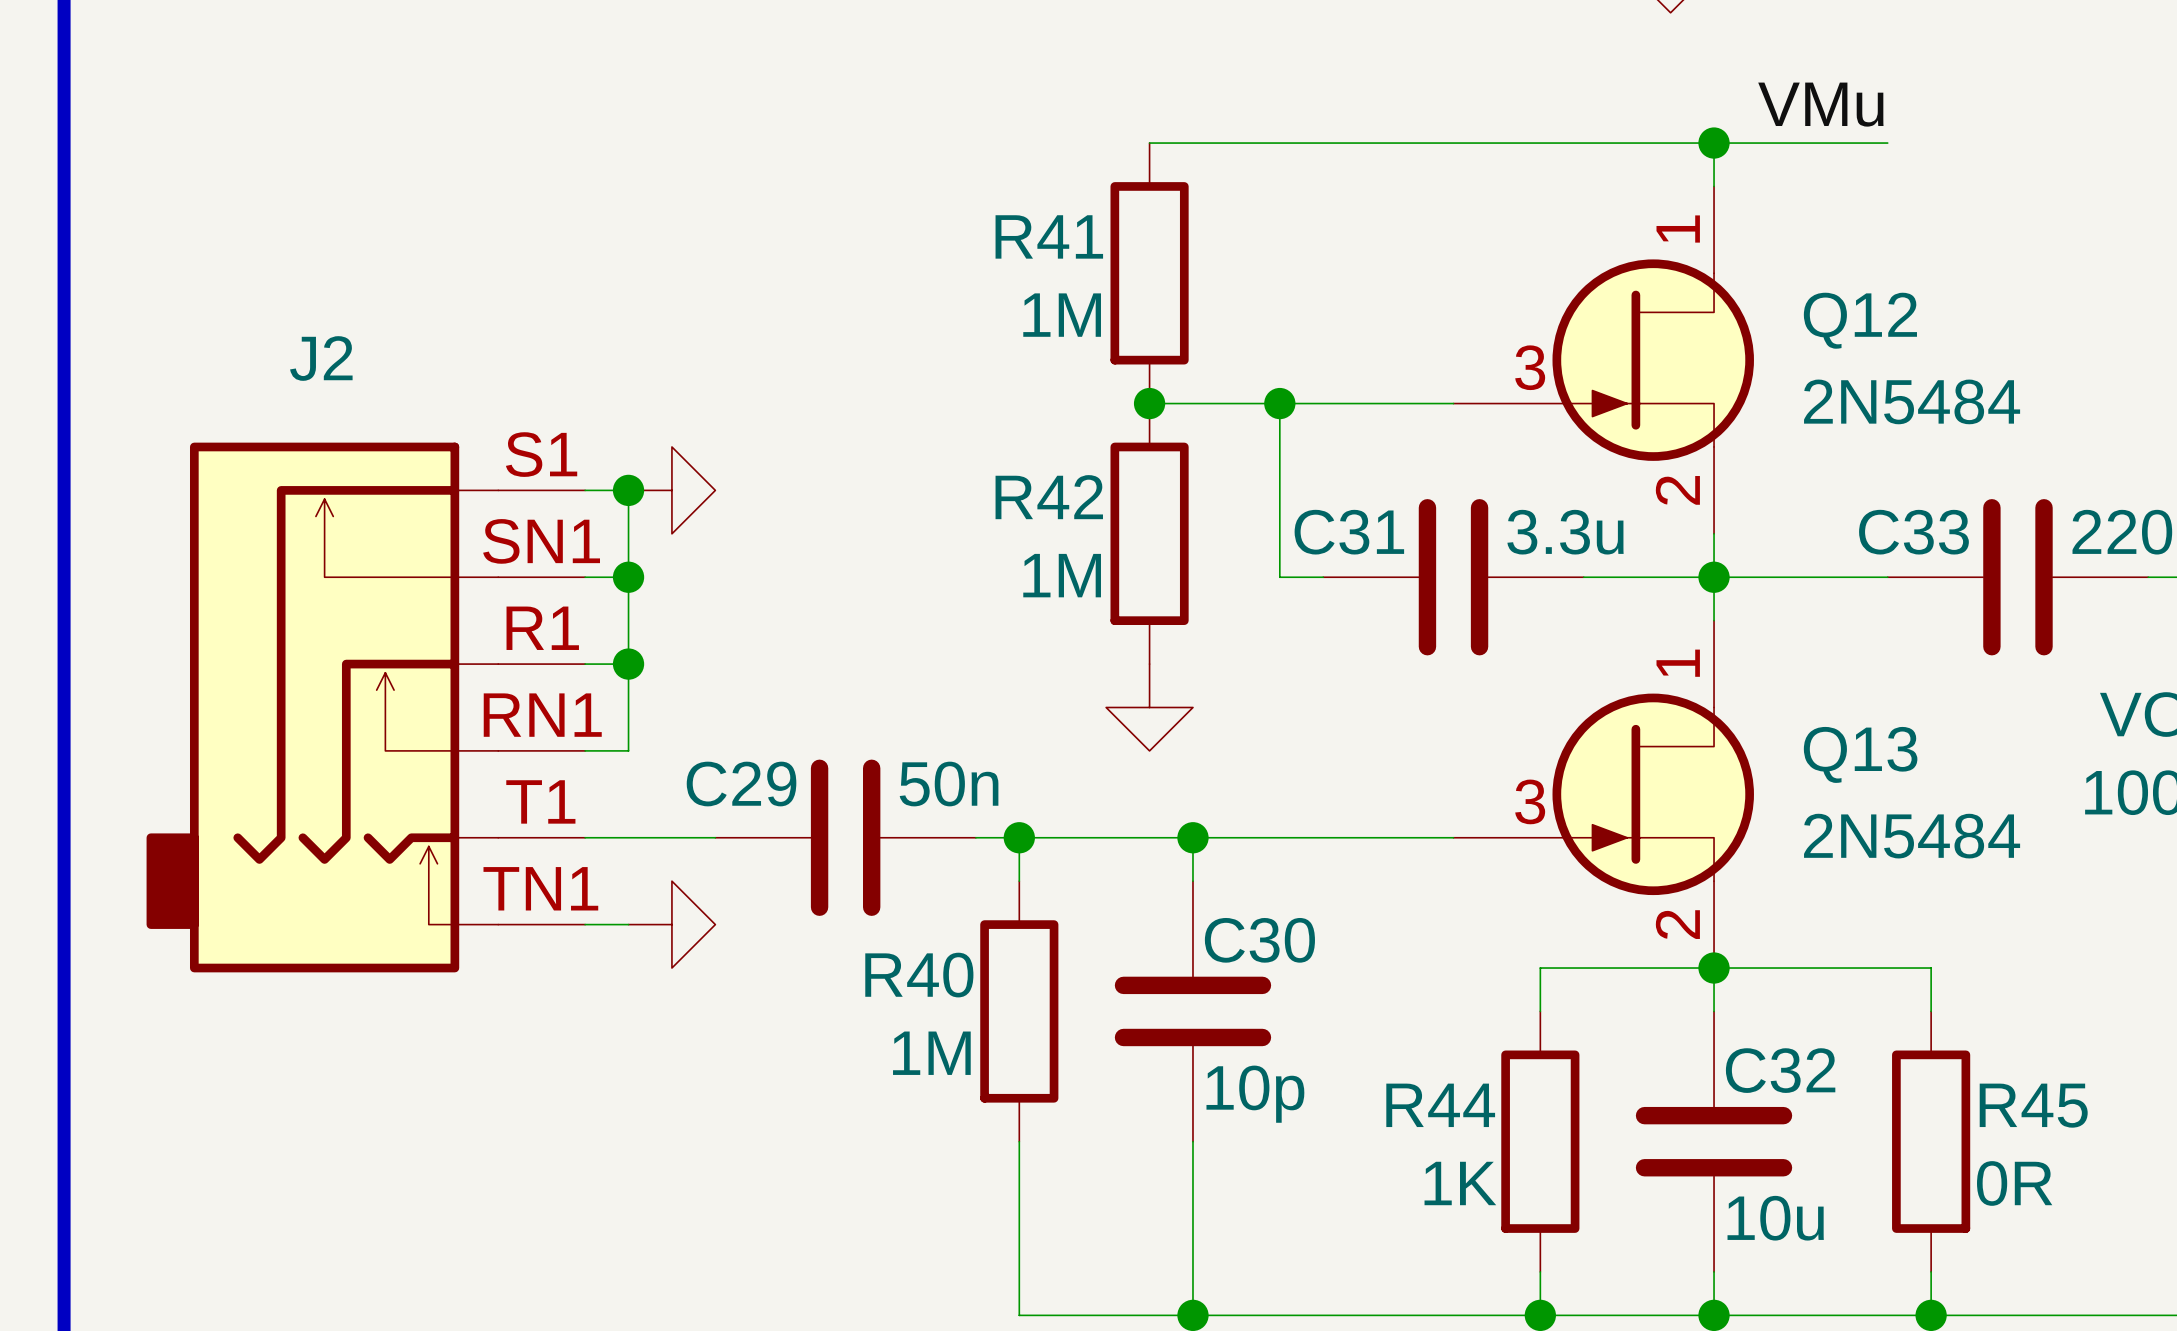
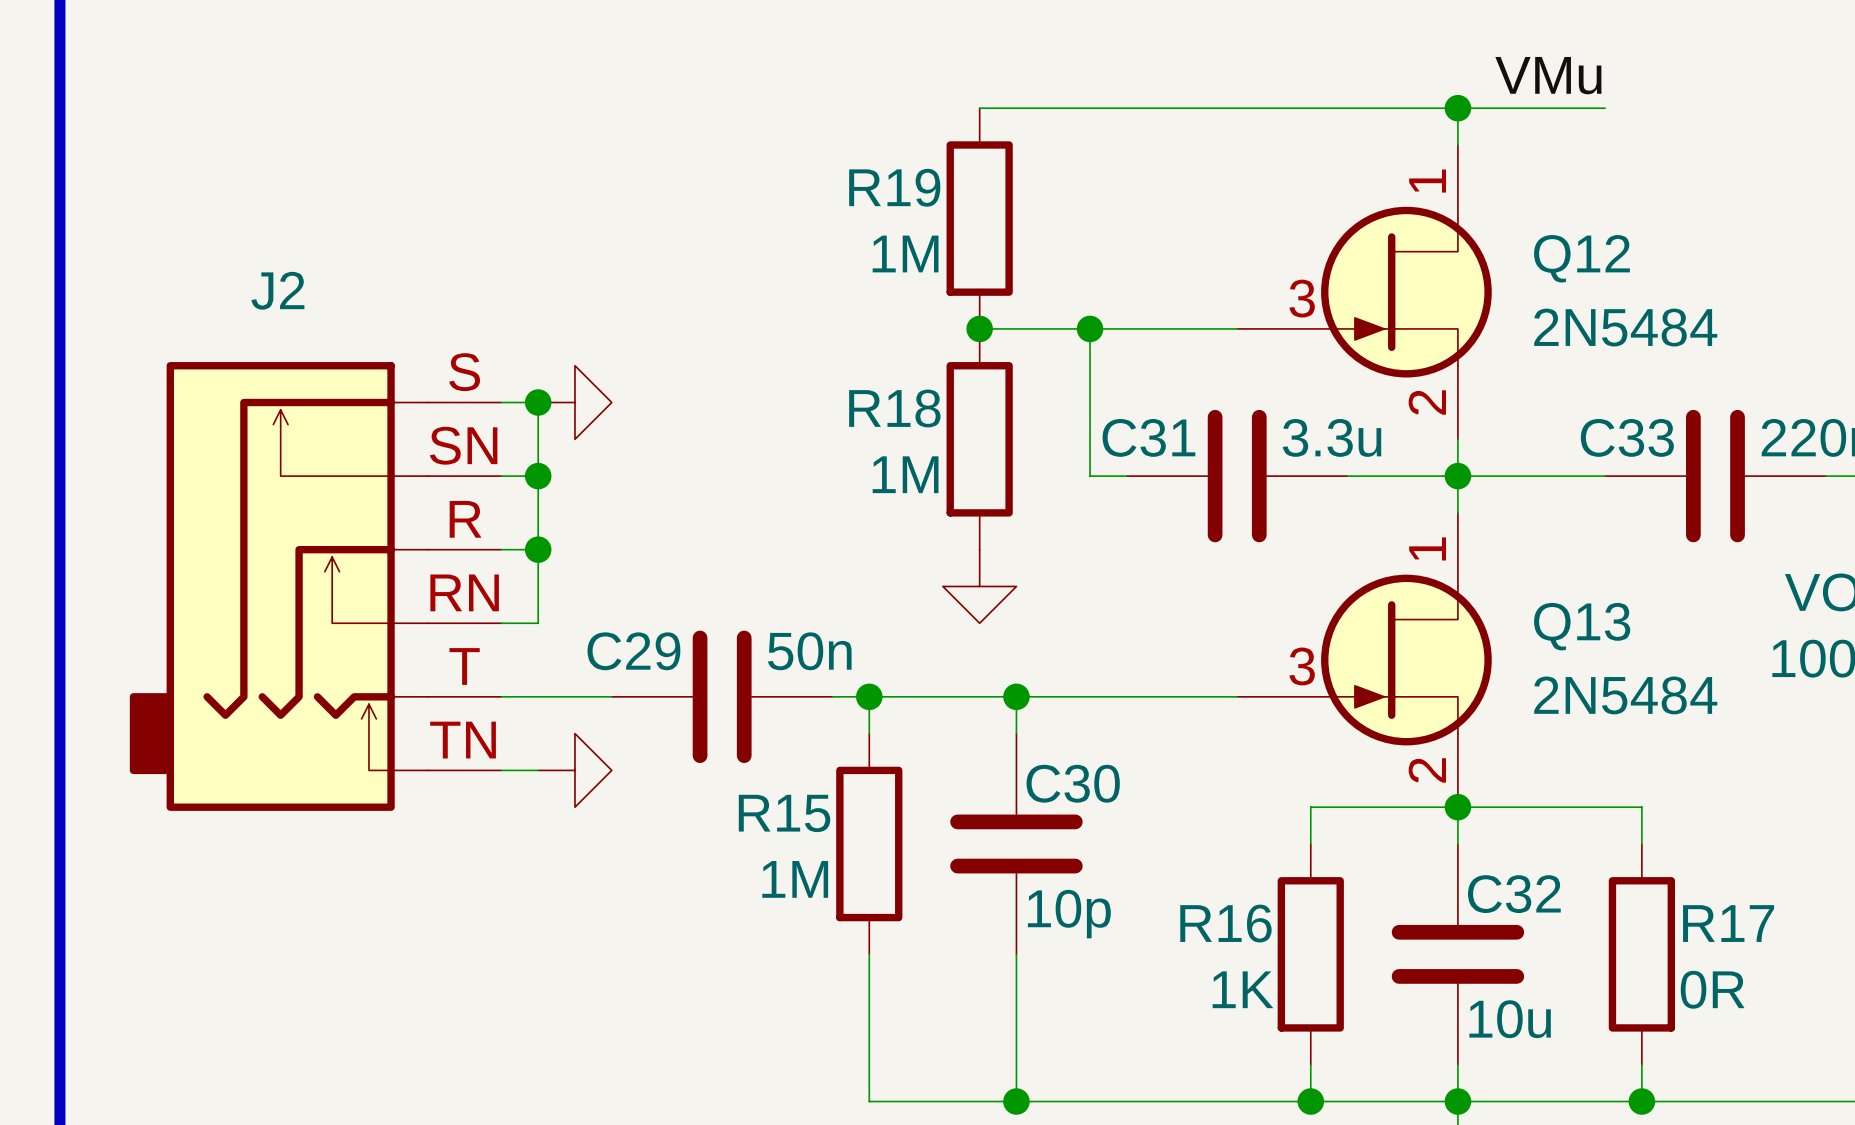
R41 name: R41 (1049, 236) -> R19 (894, 187)
J2 pin number: S1 (541, 454) -> S (464, 372)
R42 name: R42 (1049, 497) -> R18 (894, 408)
J2 pin number: SN1 (541, 541) -> SN (463, 445)
J2 pin number: R1 (542, 628) -> R (465, 519)
J2 pin number: RN1 (542, 715) -> RN (464, 592)
J2 pin number: T1 (540, 801) -> T (464, 666)
J2 pin number: TN1 (540, 888) -> TN (463, 740)
R40 name: R40 (919, 975) -> R15 (784, 813)
R44 name: R44 (1440, 1105) -> R16 (1225, 923)
R45 name: R45 (2033, 1105) -> R17 (1728, 923)

